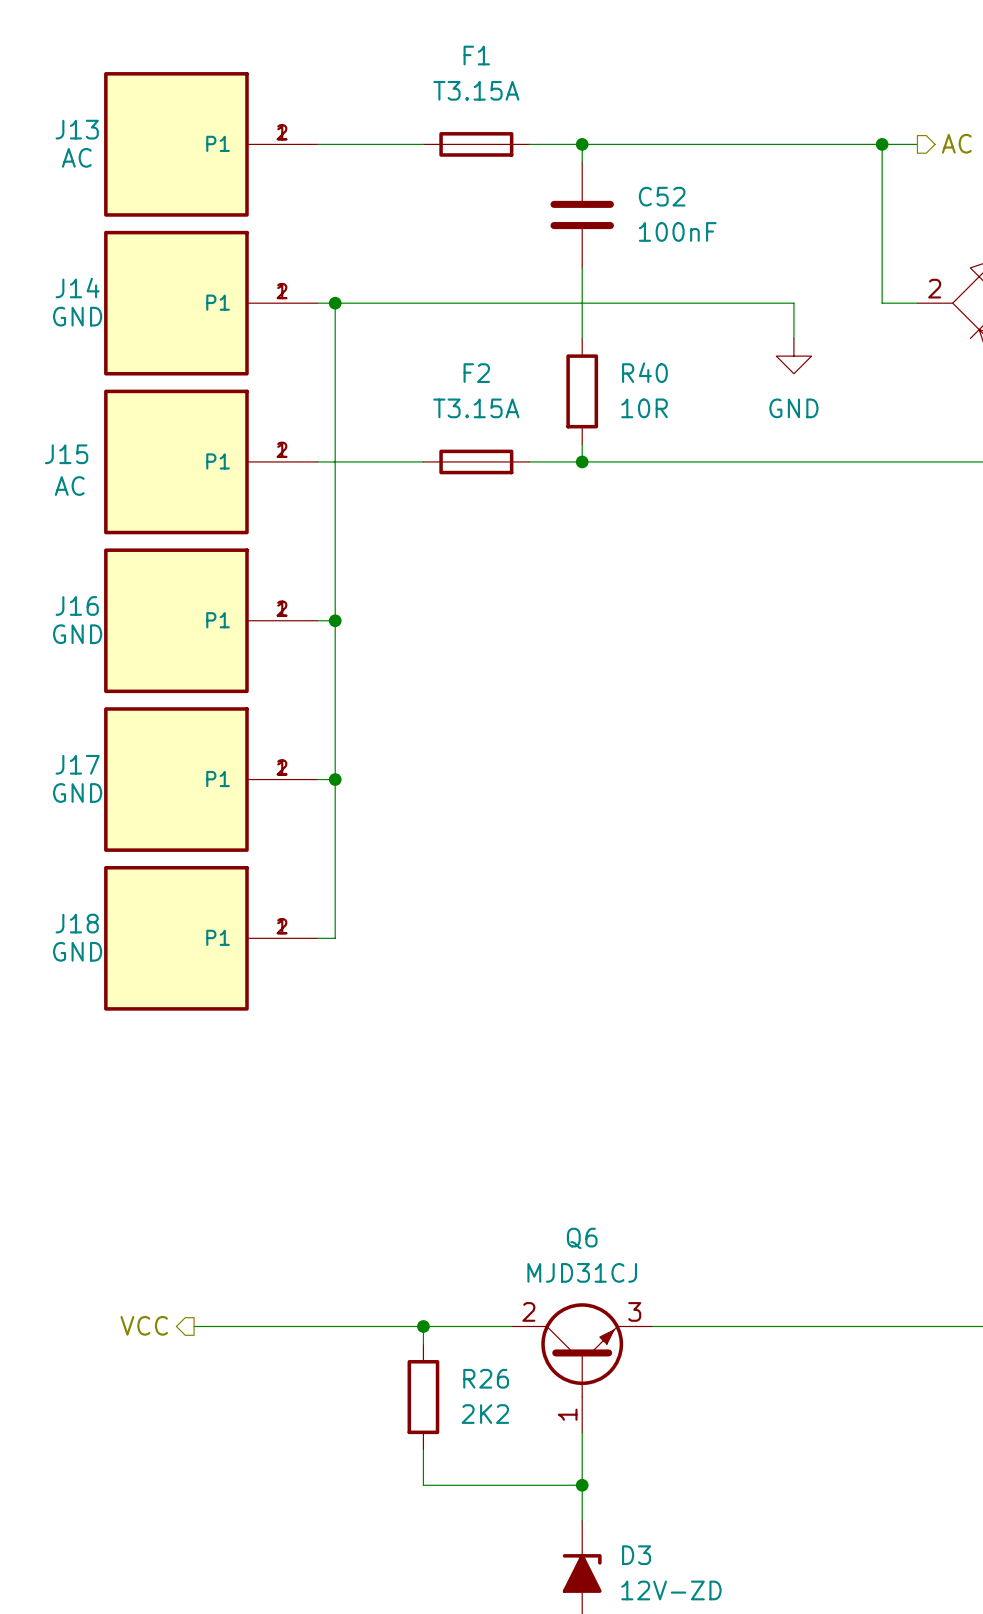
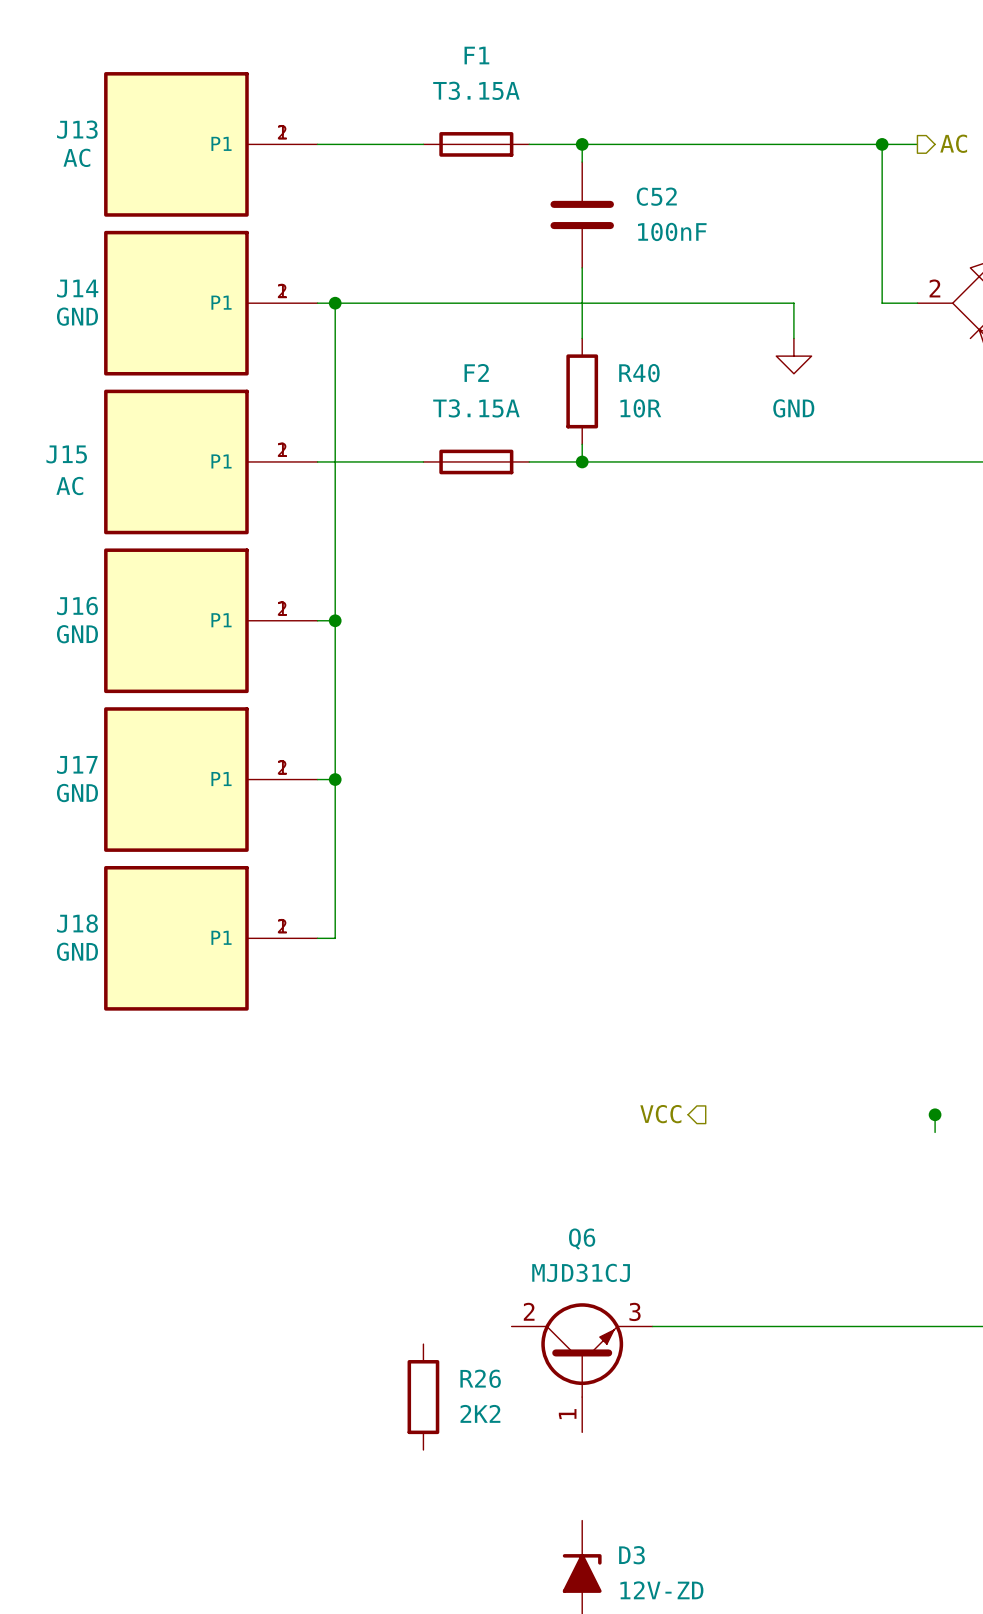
hierarchical label: none -> VCC (660, 1114)
wire: none -> (935, 1114) (935, 1132)
junction: none -> (935, 1114)
hierarchical label: VCC (144, 1325) -> none
wire: (194, 1326) (511, 1326) -> none
wire: (423, 1326) (423, 1344) -> none
junction: (423, 1326) -> none
wire: (582, 1432) (582, 1520) -> none
wire: (423, 1449) (423, 1485) (582, 1485) -> none
junction: (582, 1485) -> none

